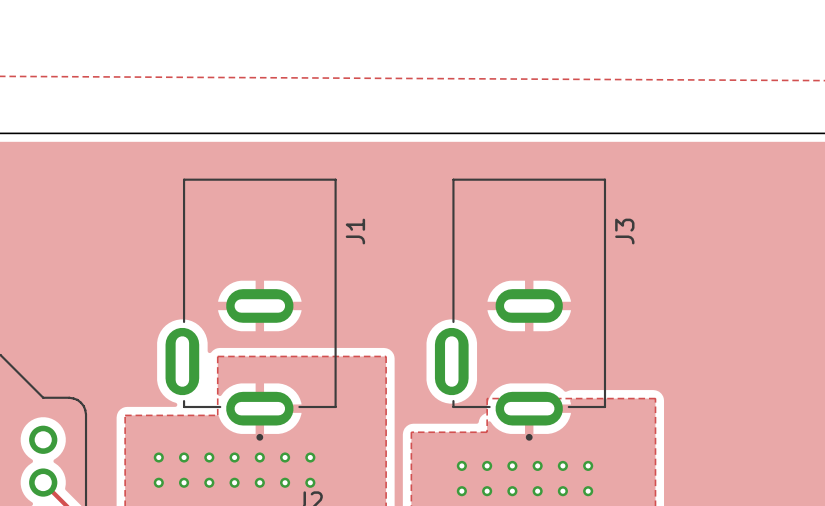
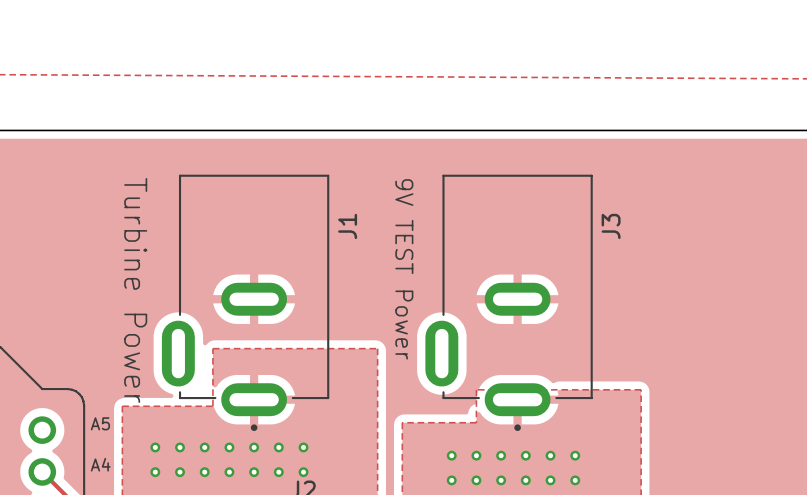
text: none -> 9V TEST Power (404, 269)
text: none -> Turbine Power (135, 290)
text: none -> A5 (100, 423)
text: none -> A4 (100, 464)

